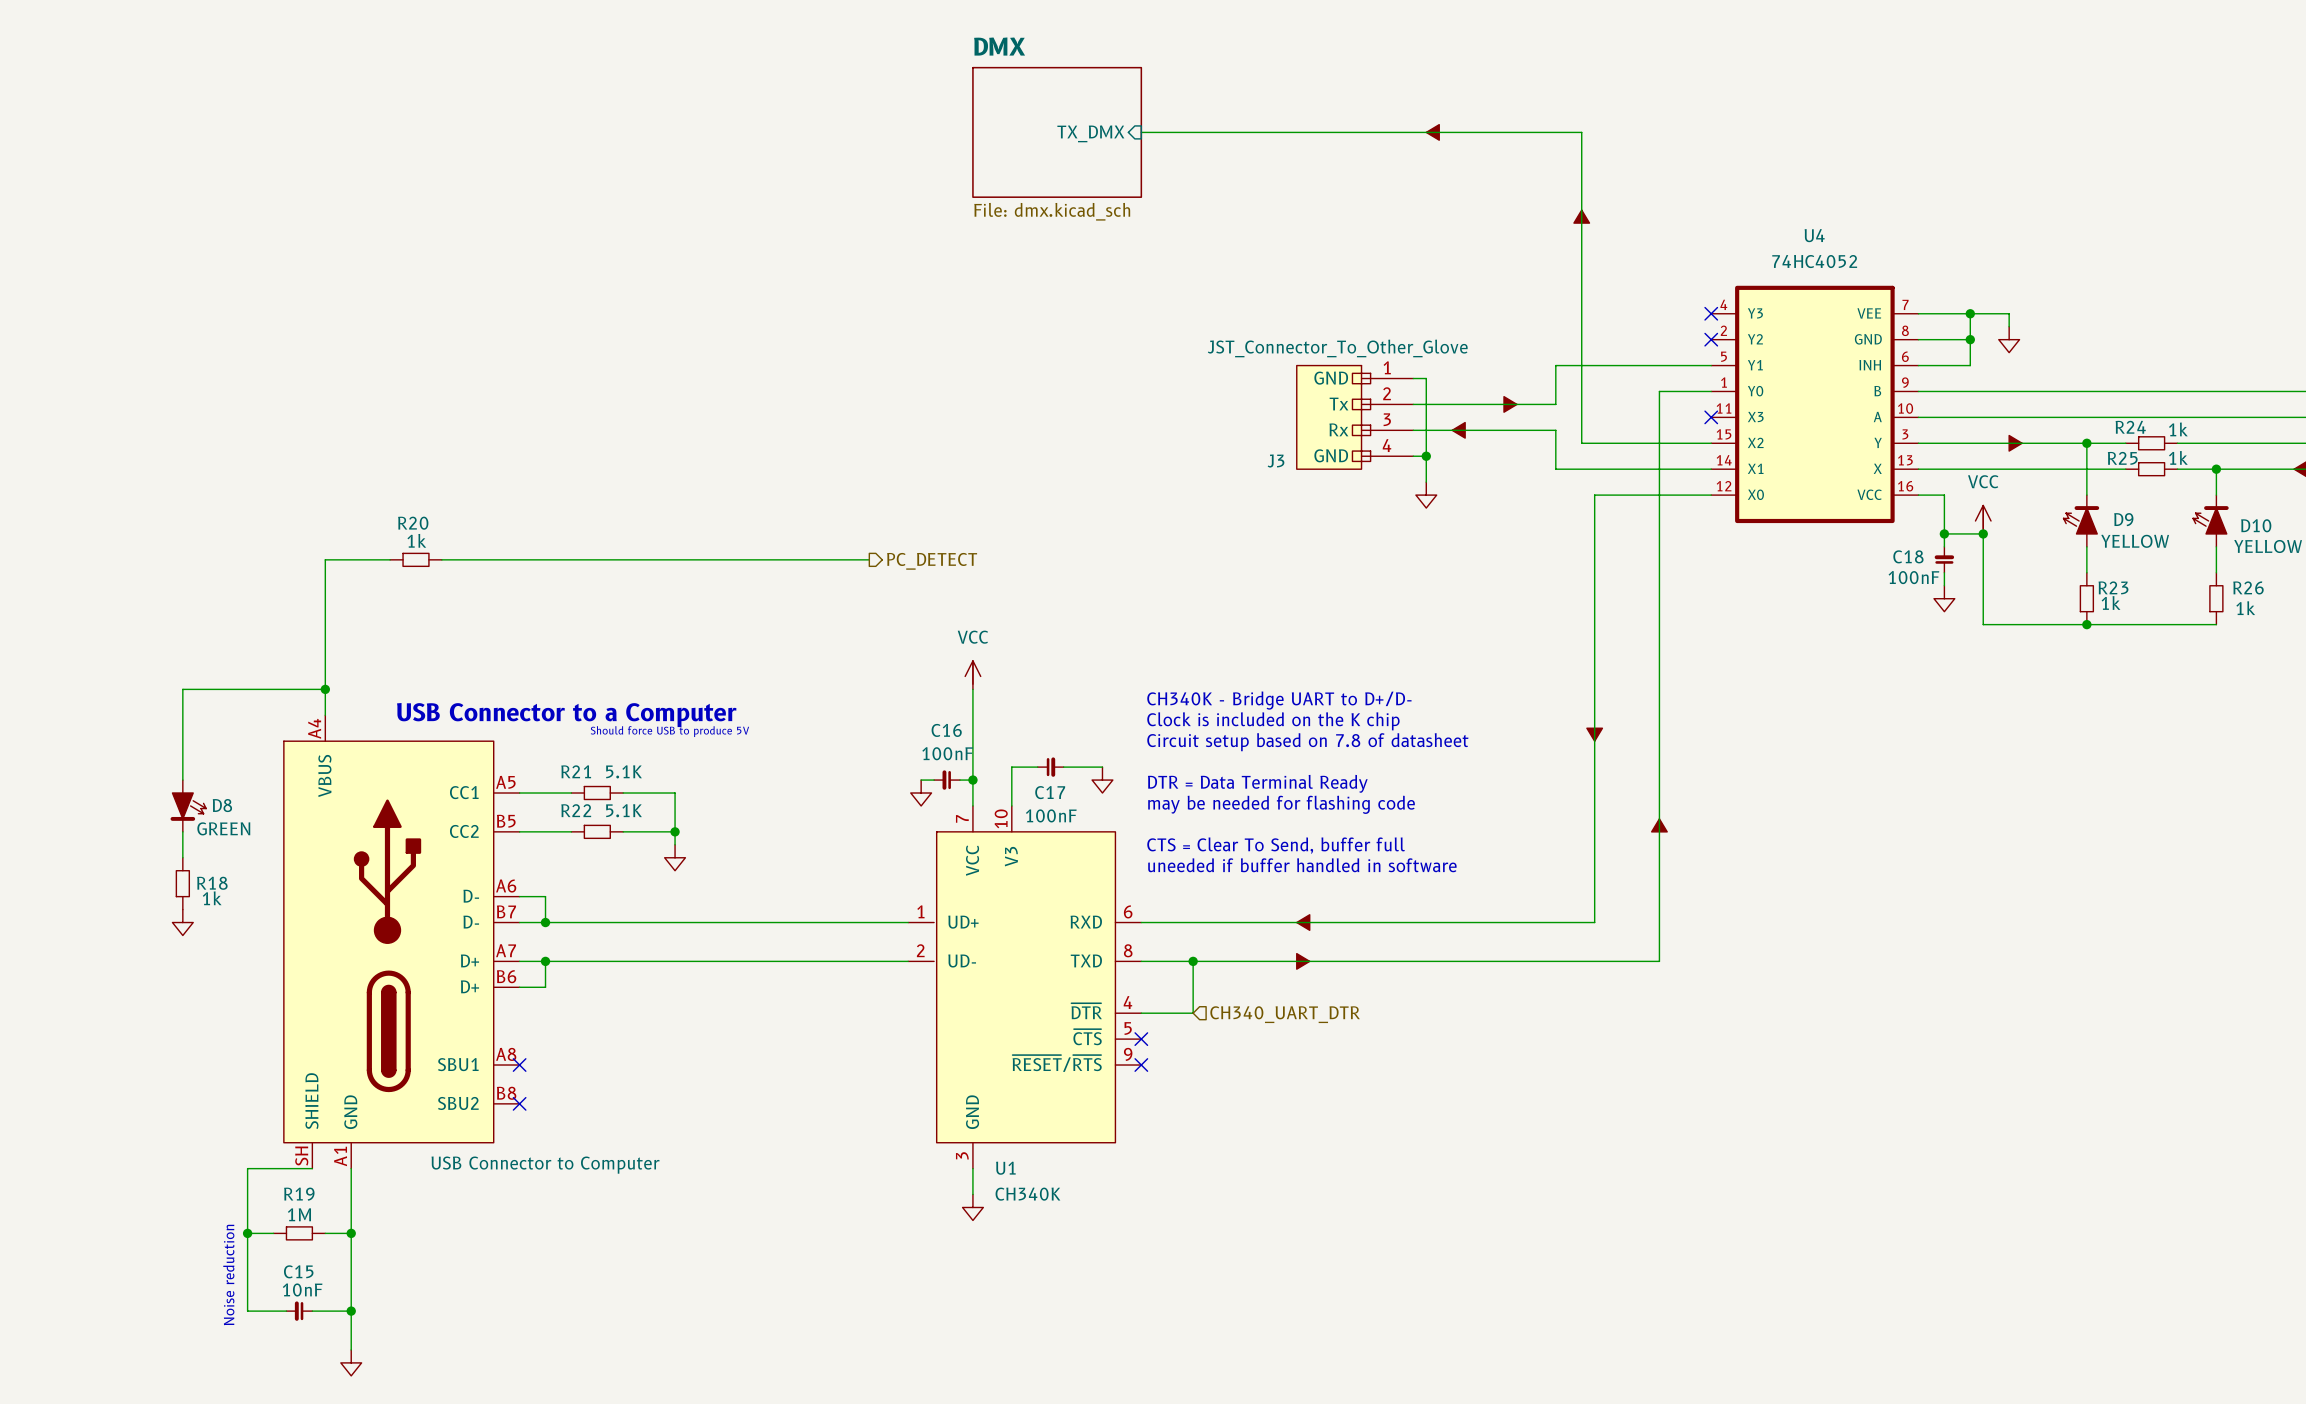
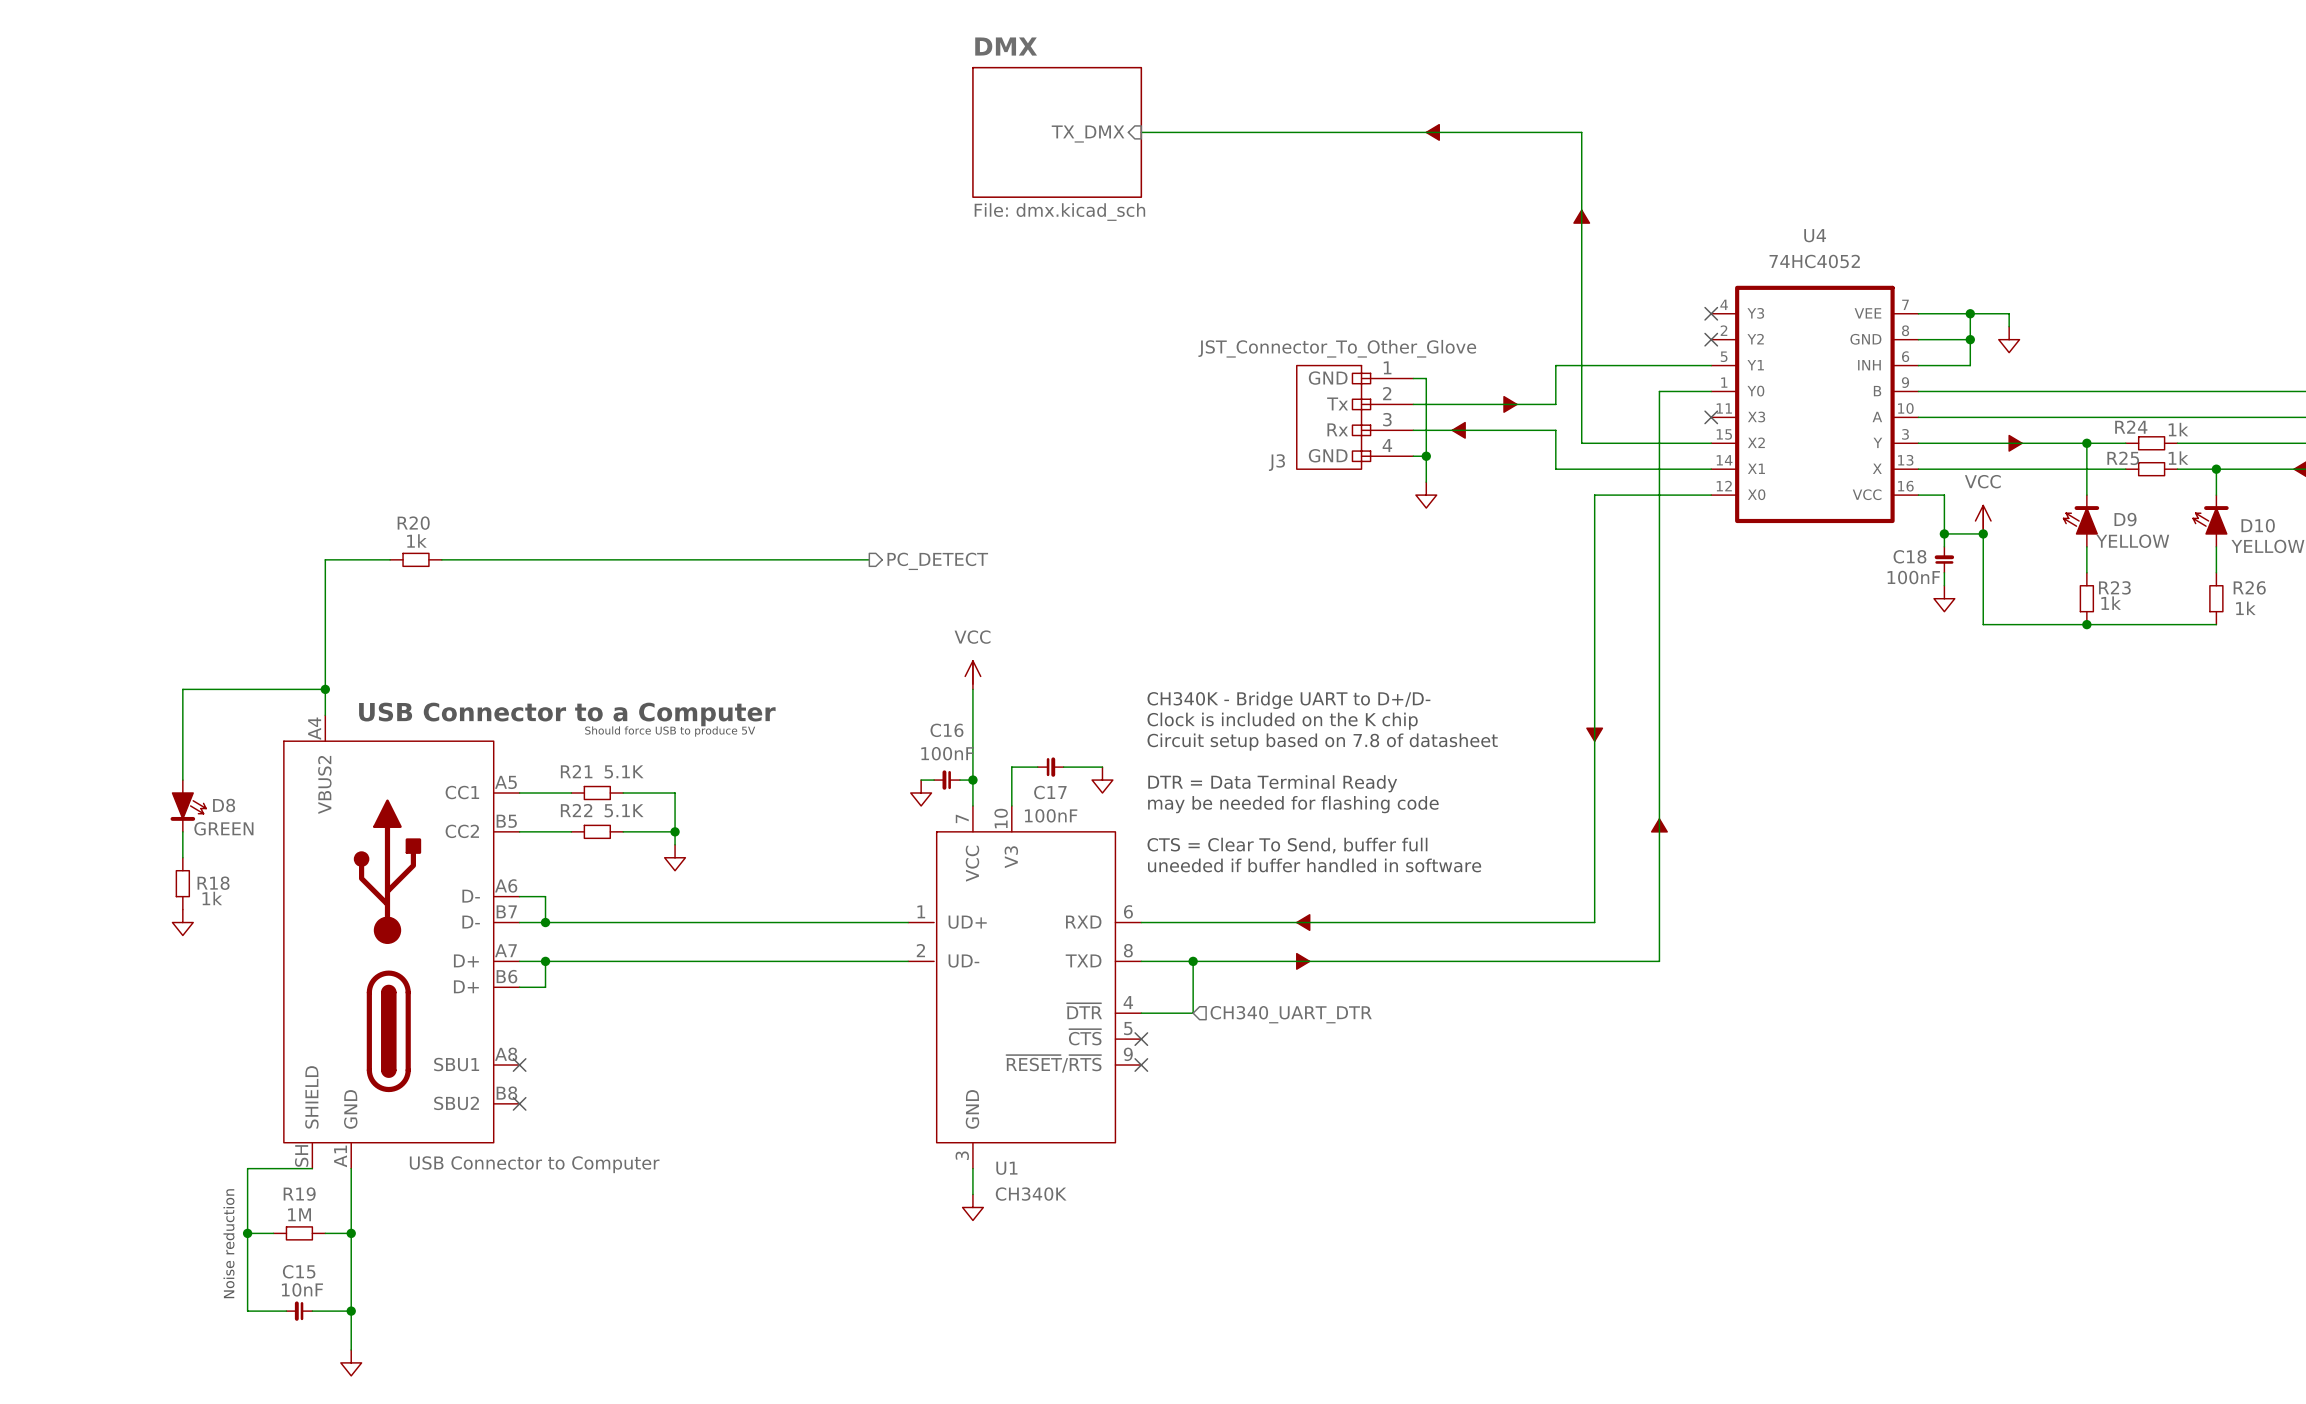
part pin name: VBUS (324, 775) -> VBUS2 (324, 784)
text position: Noise reduction (228, 1274) -> Noise reduction (228, 1243)

